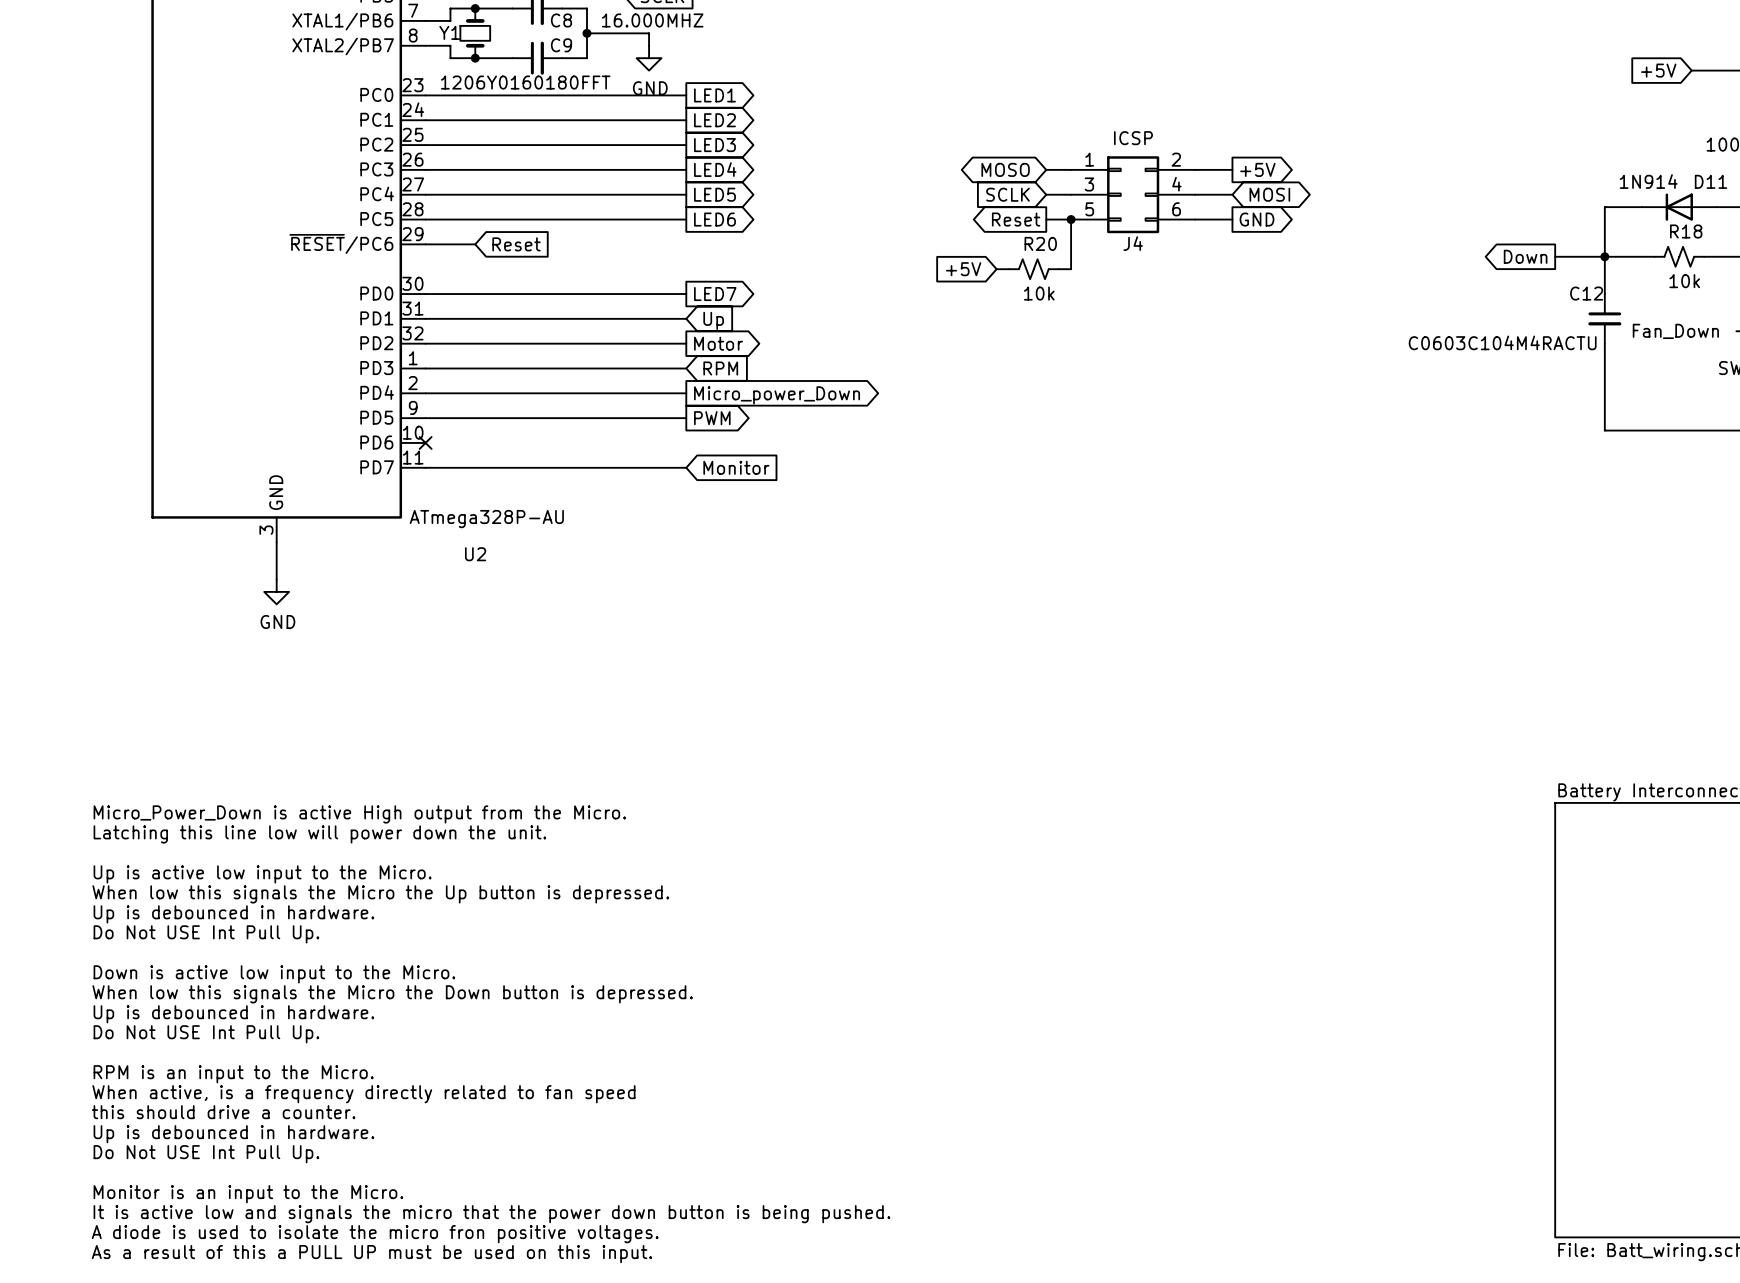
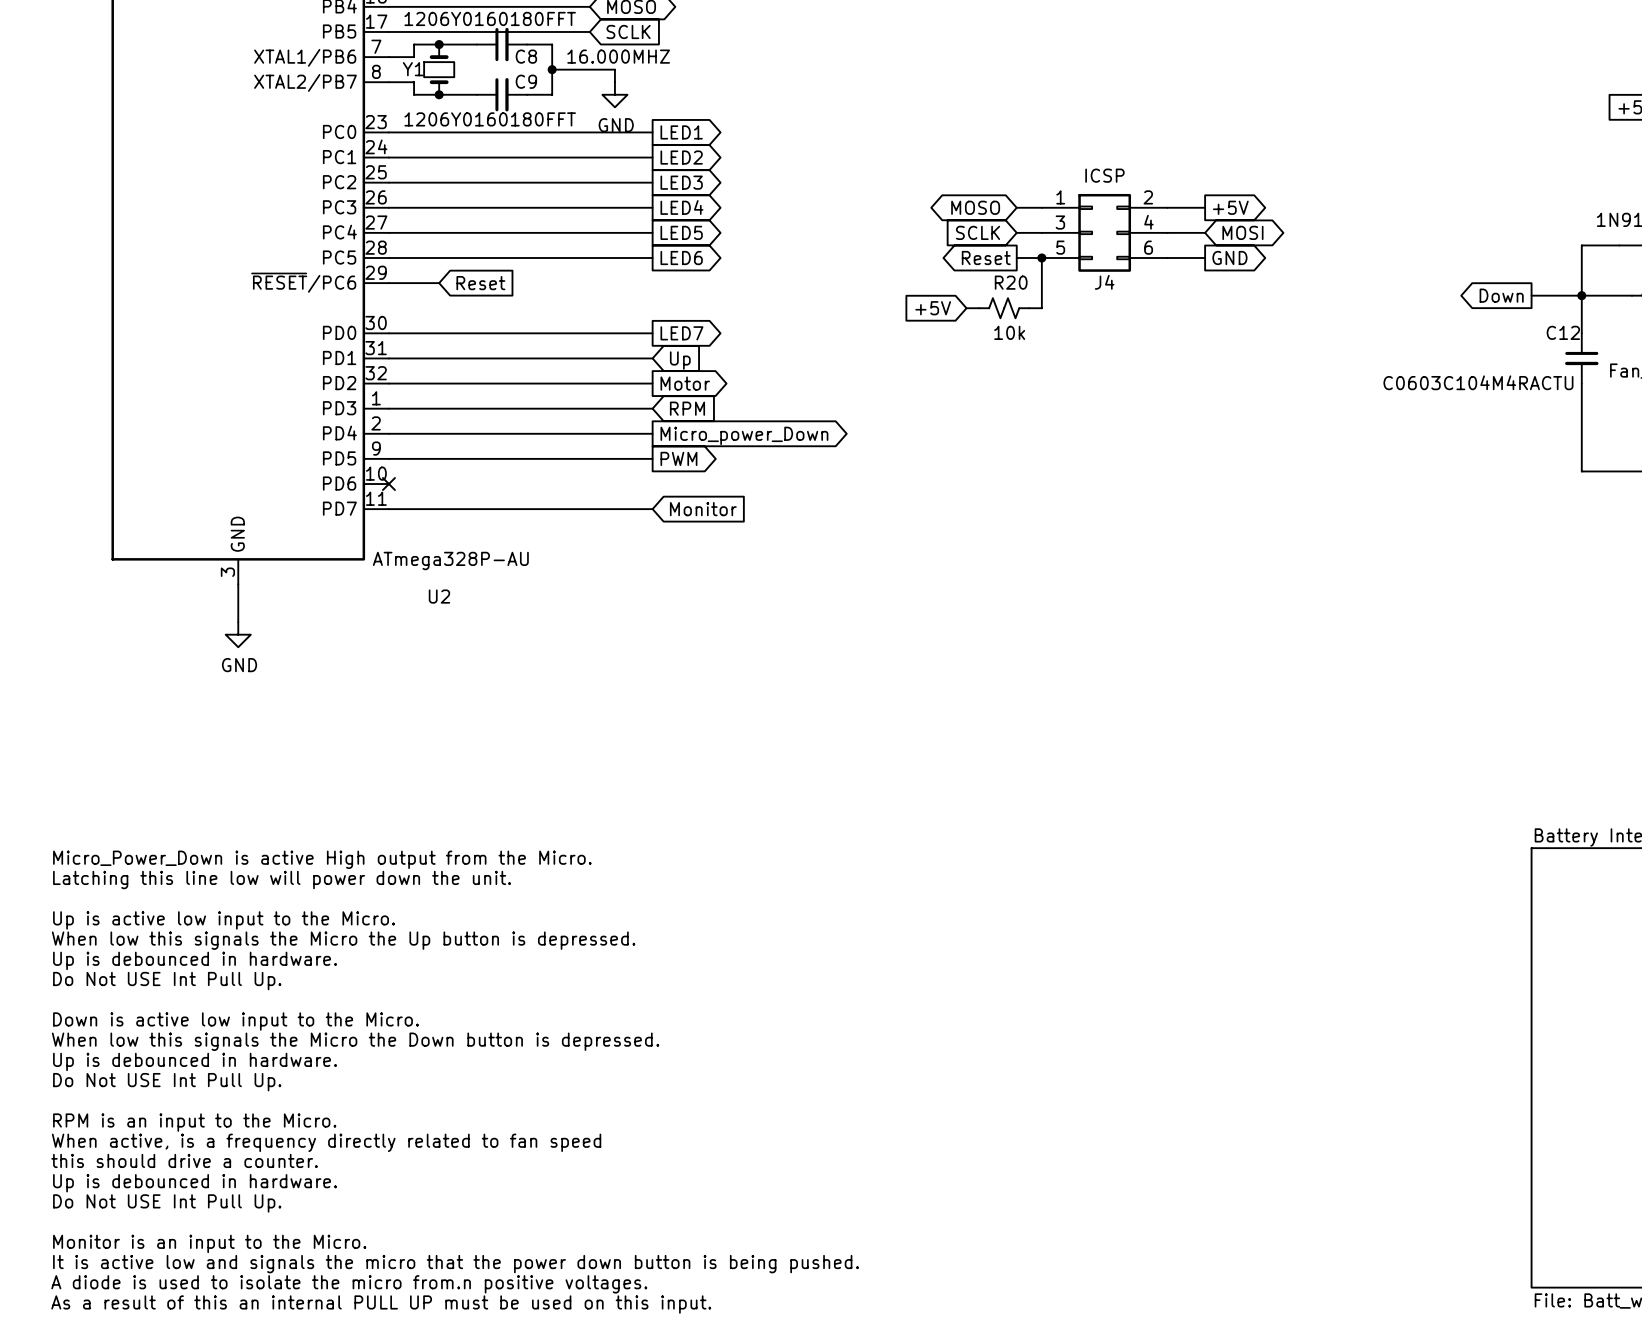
text: A diode is used to isolate the micro fron positive voltages. (375, 1234) -> A diode is used to isolate the micro from.n positive voltages. (349, 1284)
text: As a result of this a PULL UP must be used on this input. (371, 1254) -> As a result of this an internal PULL UP must be used on this input. (381, 1304)

